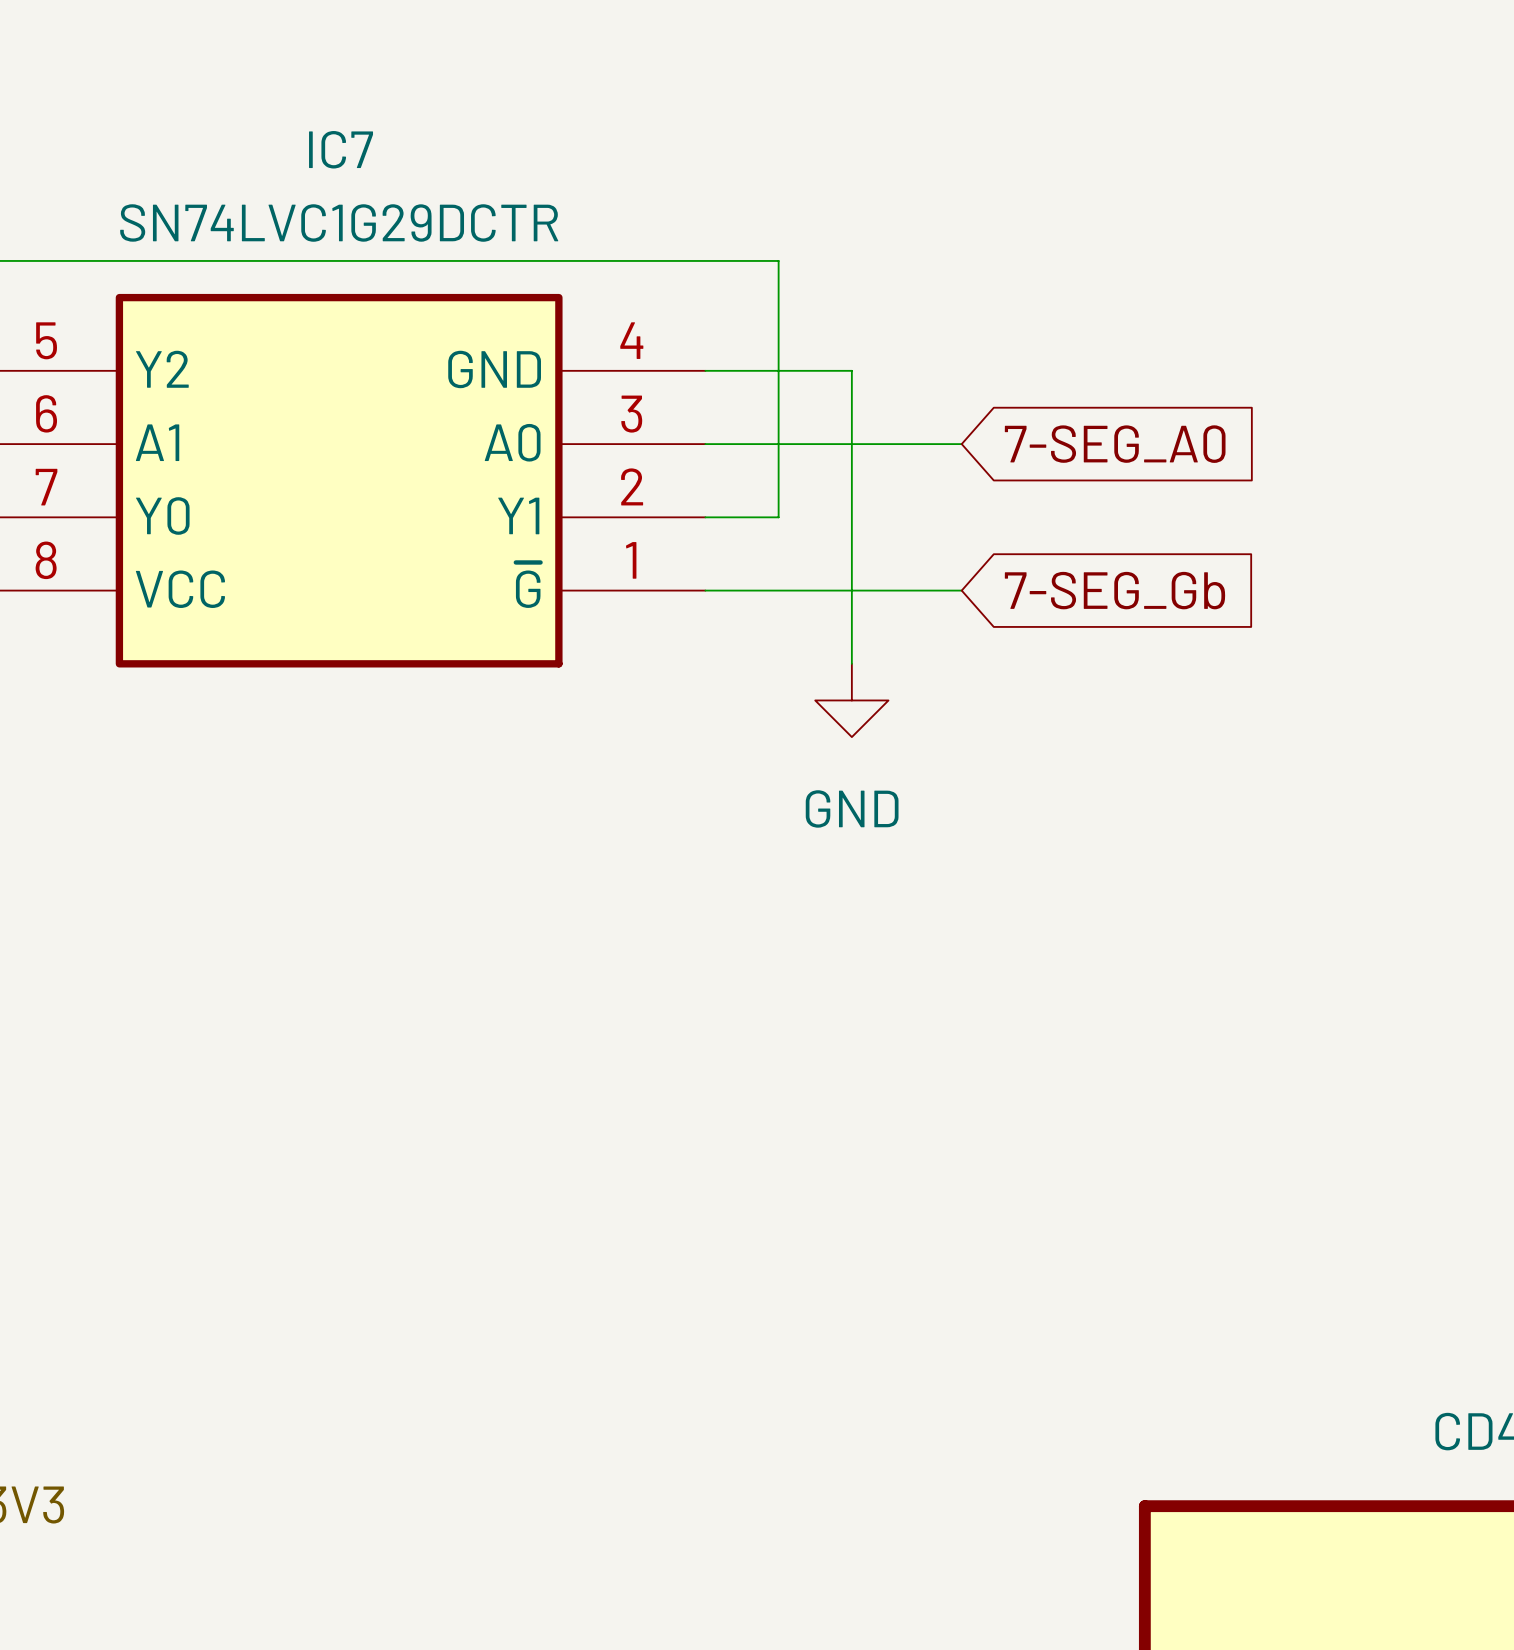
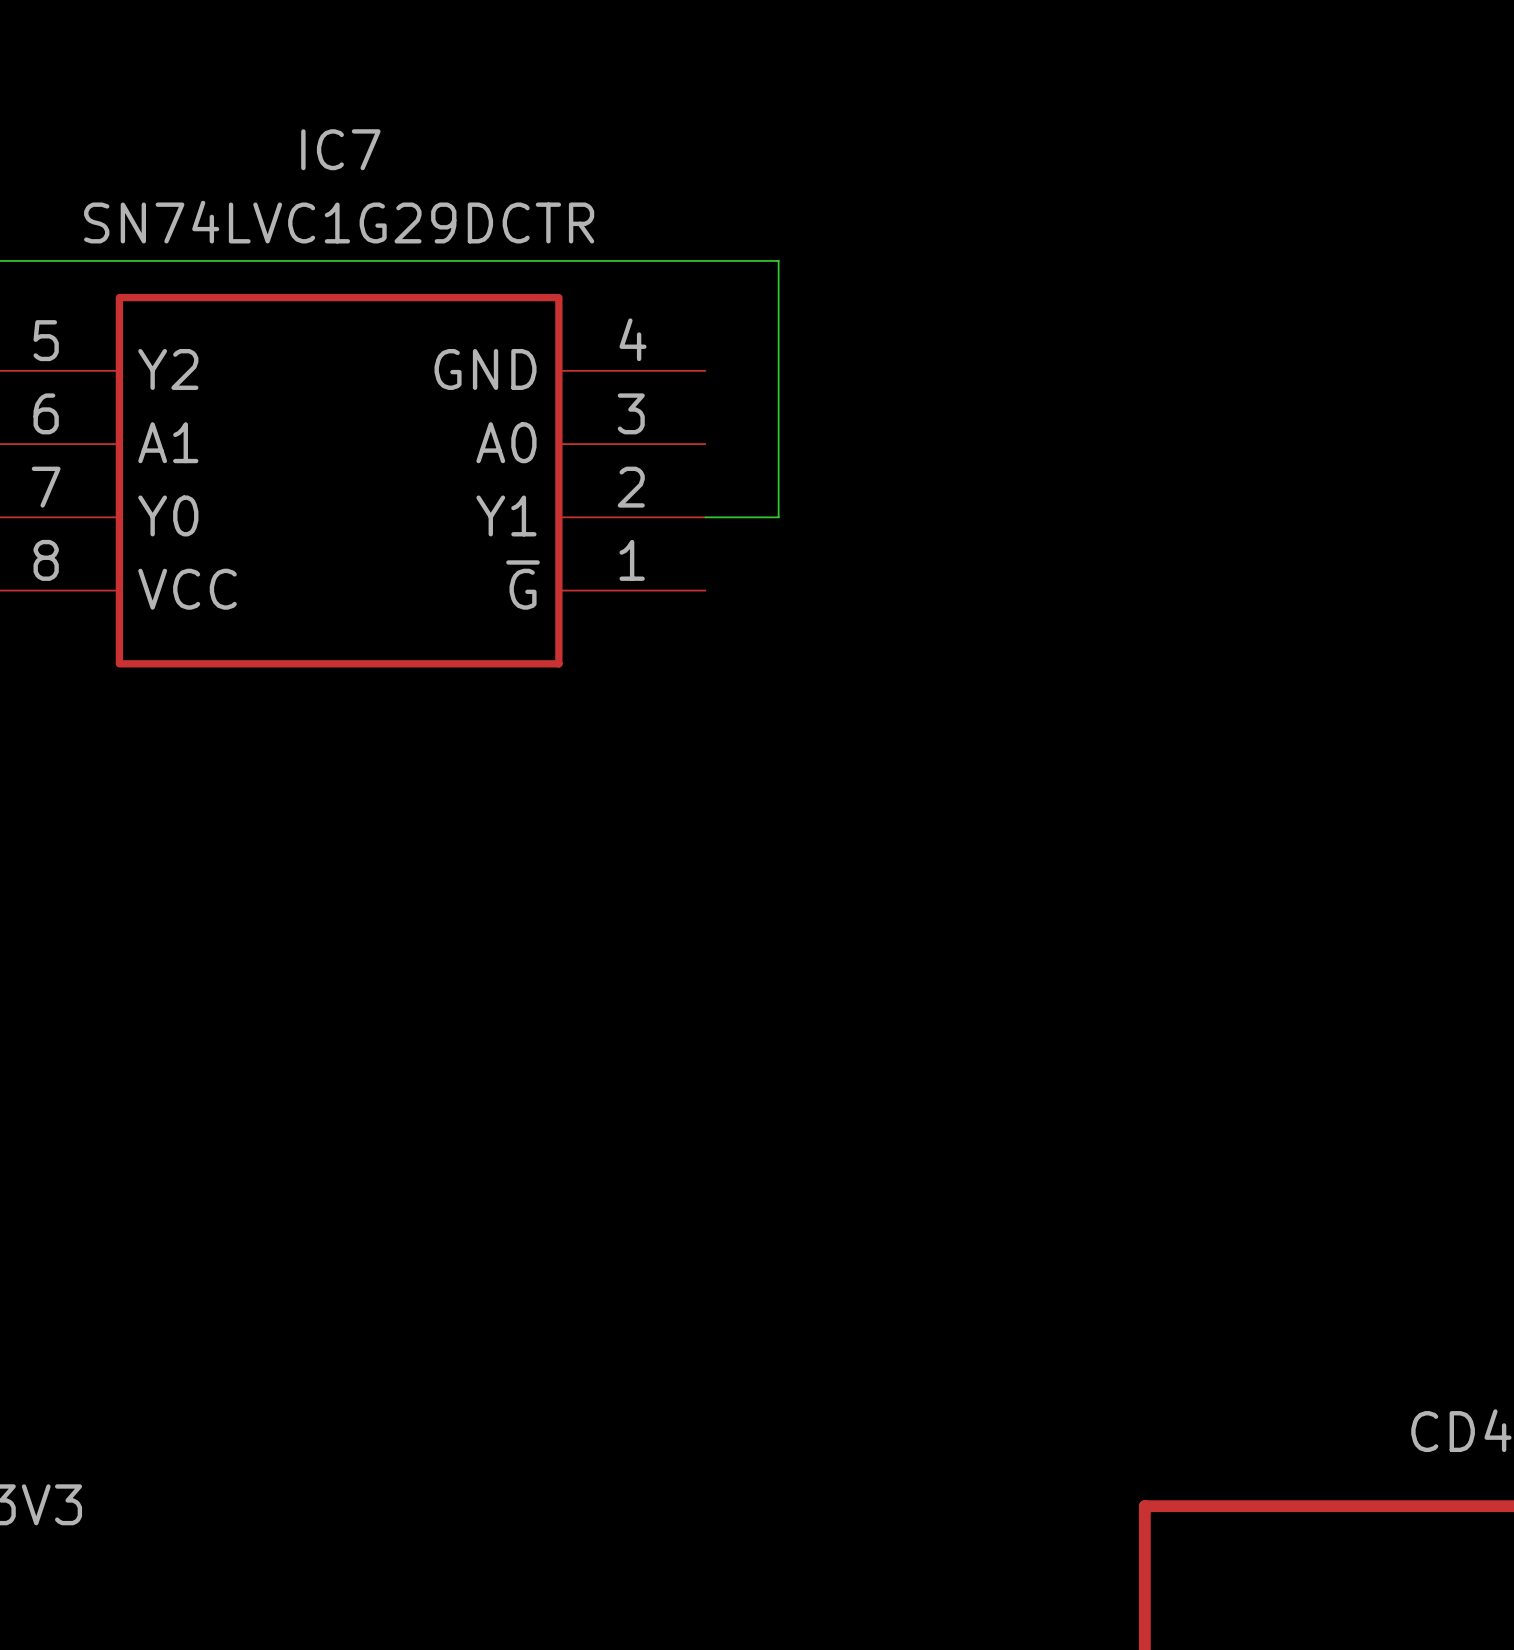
wire: (705, 370) (851, 370) (851, 663) -> none
wire: (705, 444) (961, 444) -> none
global label: 7-SEG_A0 (1115, 444) -> none
wire: (705, 590) (961, 590) -> none
global label: 7-SEG_Gb (1114, 590) -> none
power symbol: GND (851, 700) -> none

